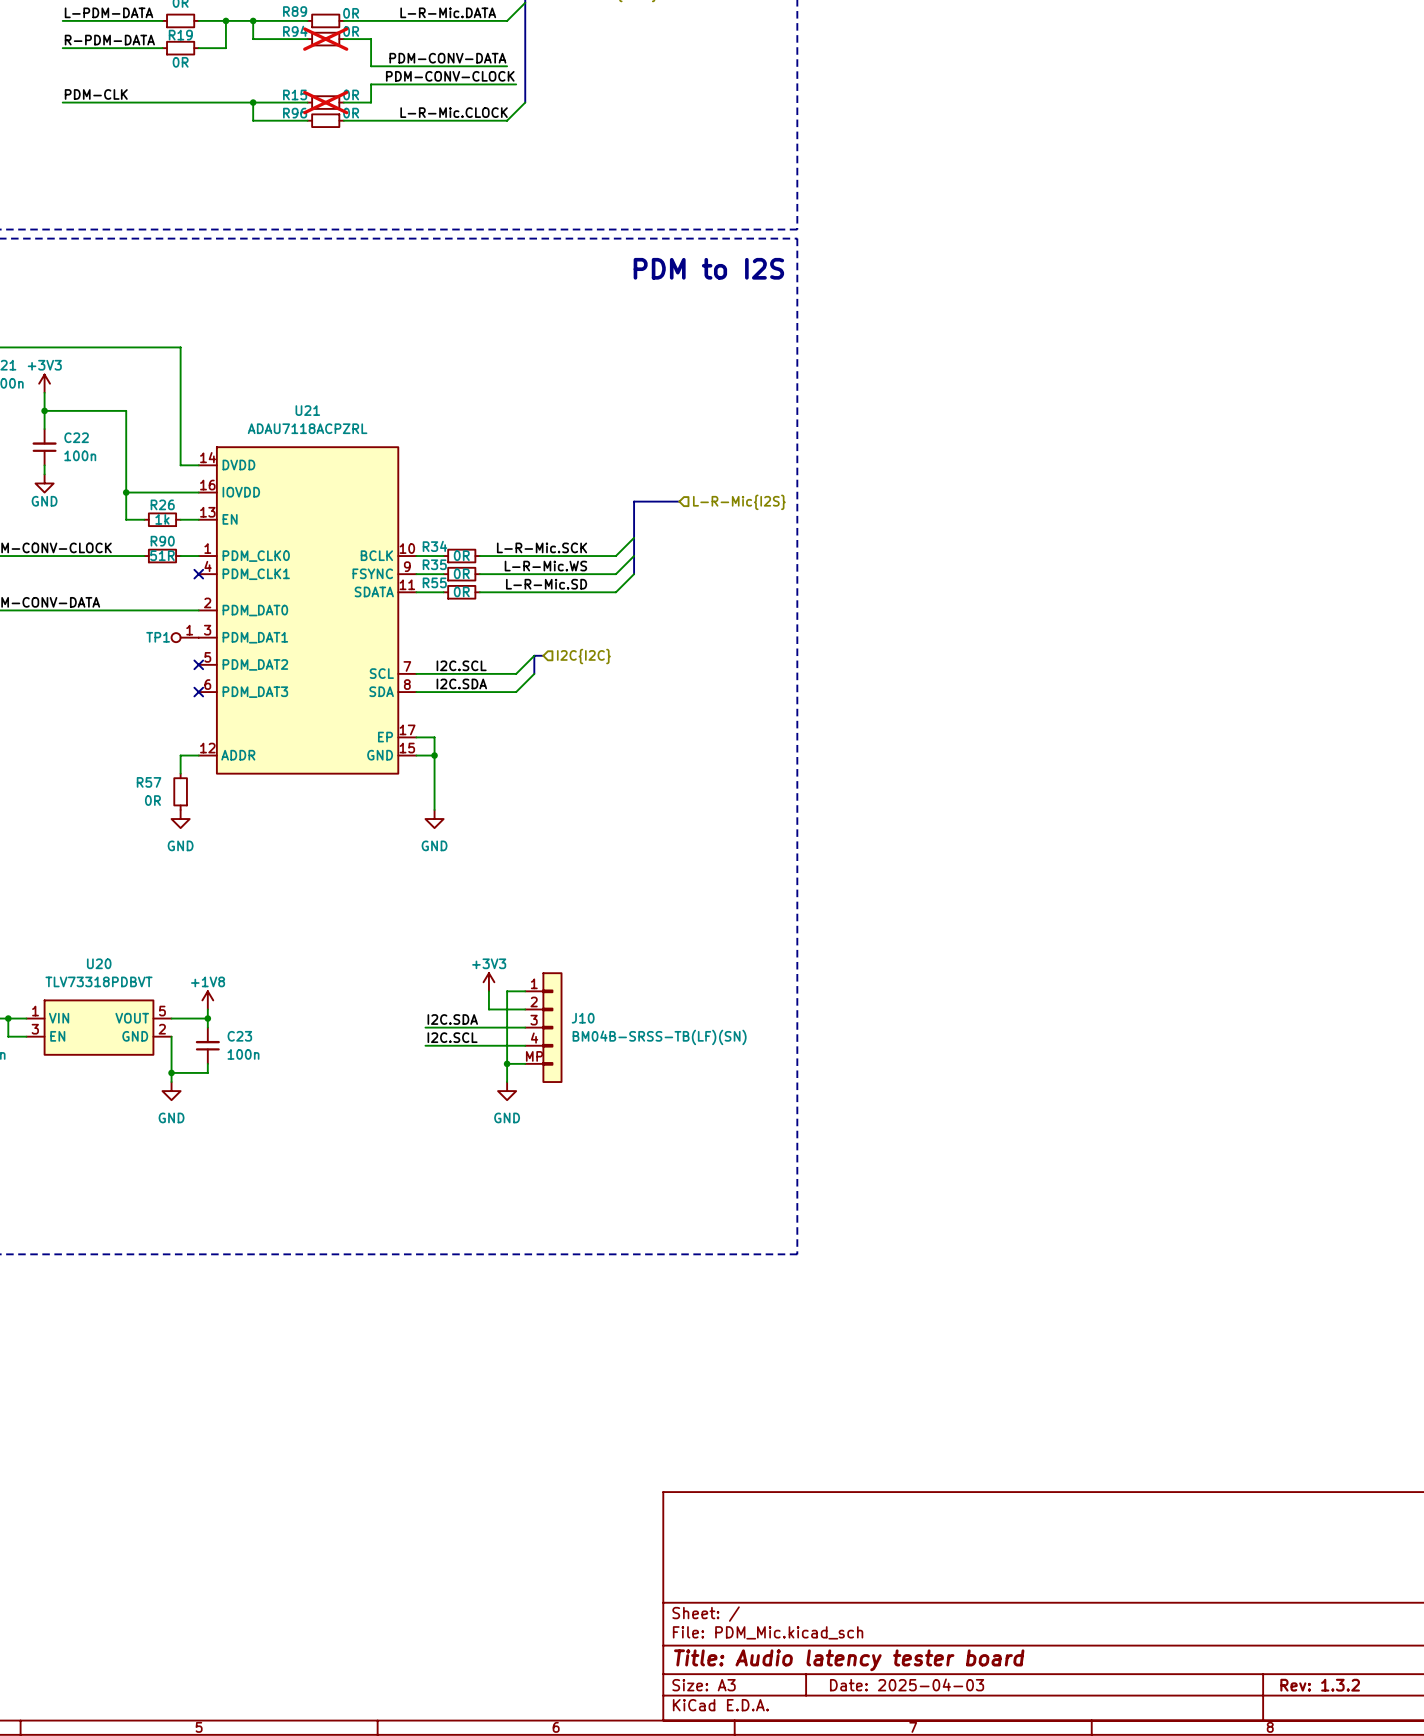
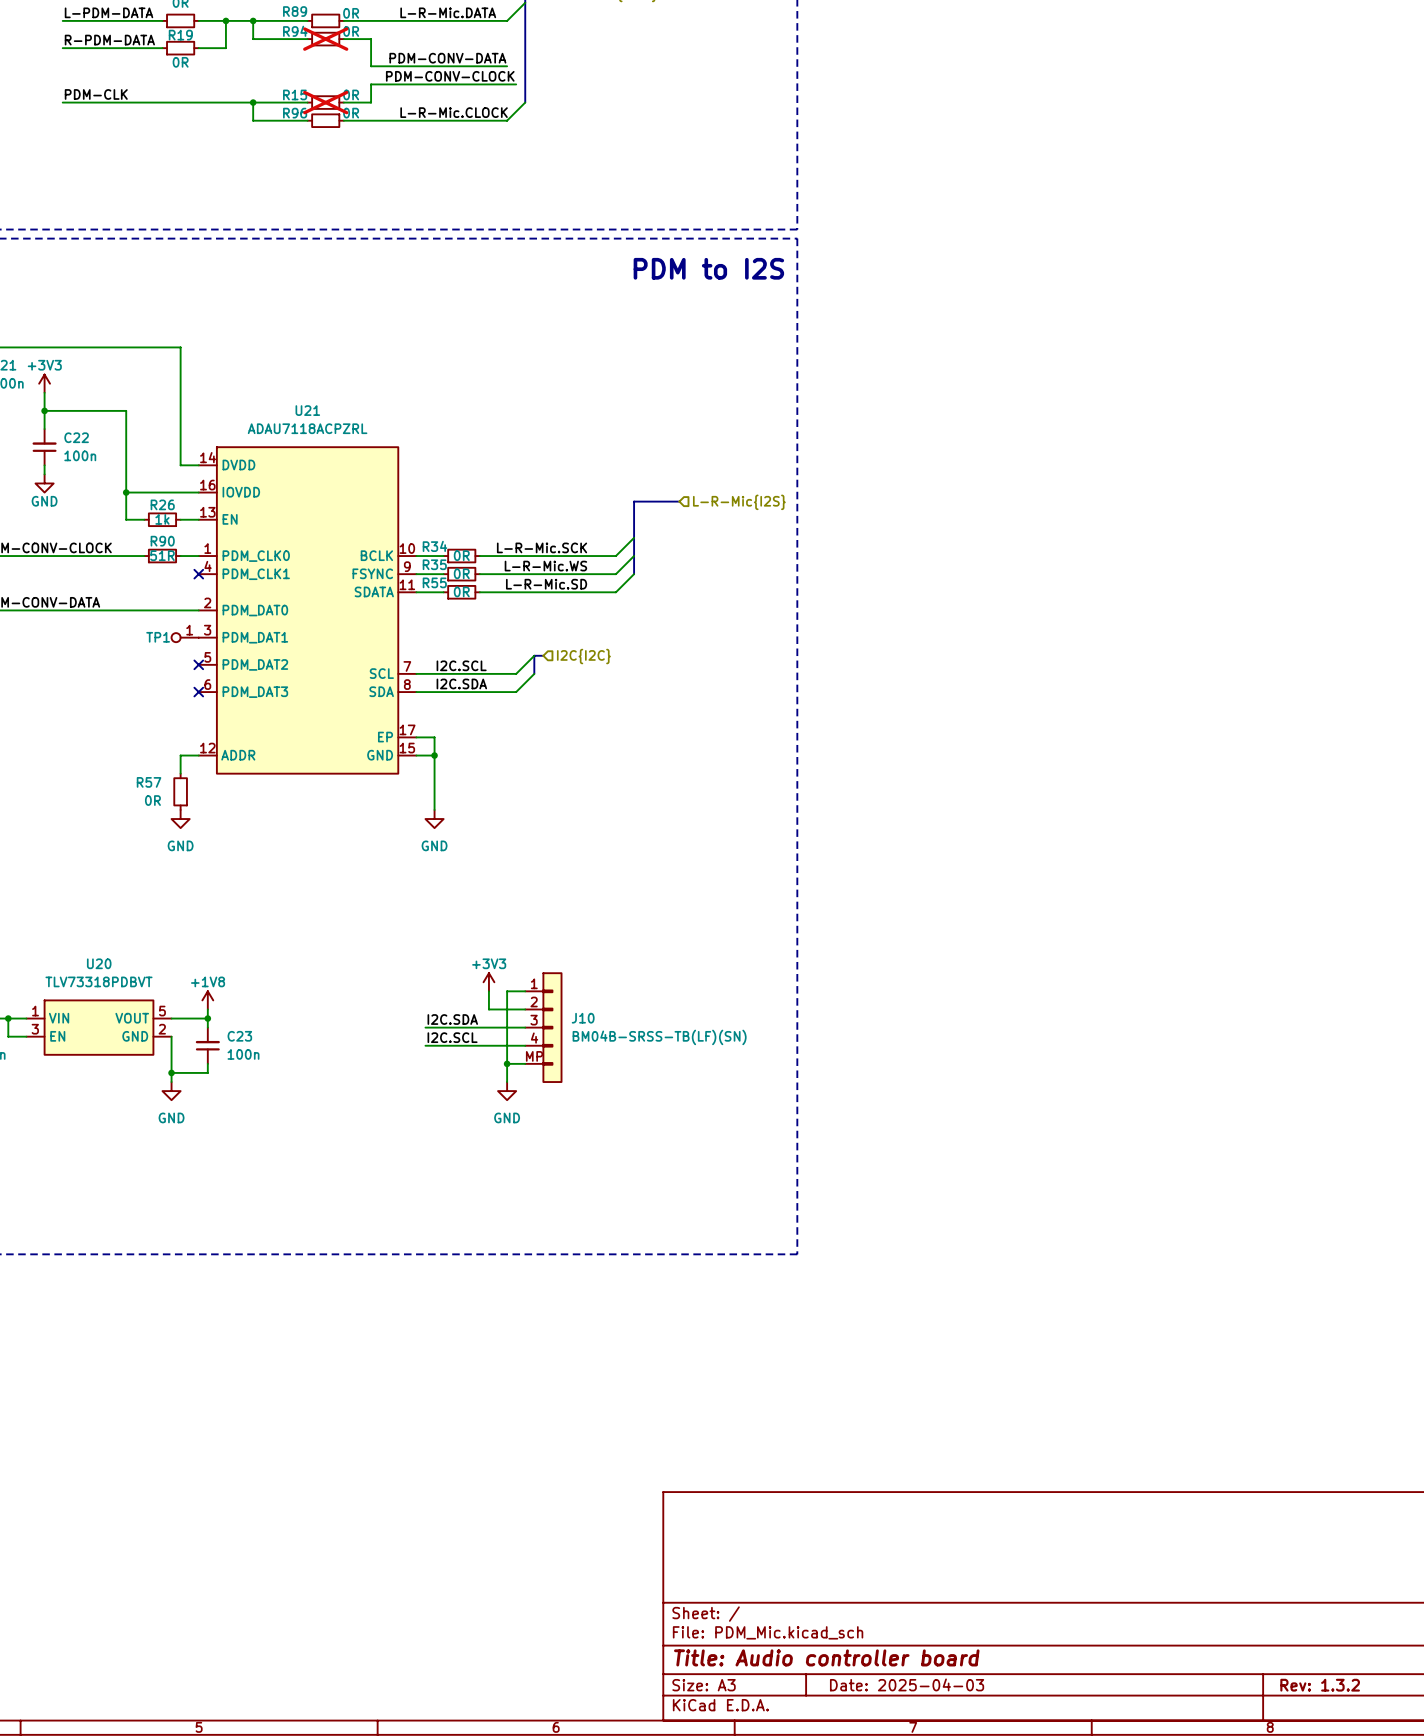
title block: Title: Audio latency tester board (849, 1660) -> Title: Audio controller board (826, 1657)

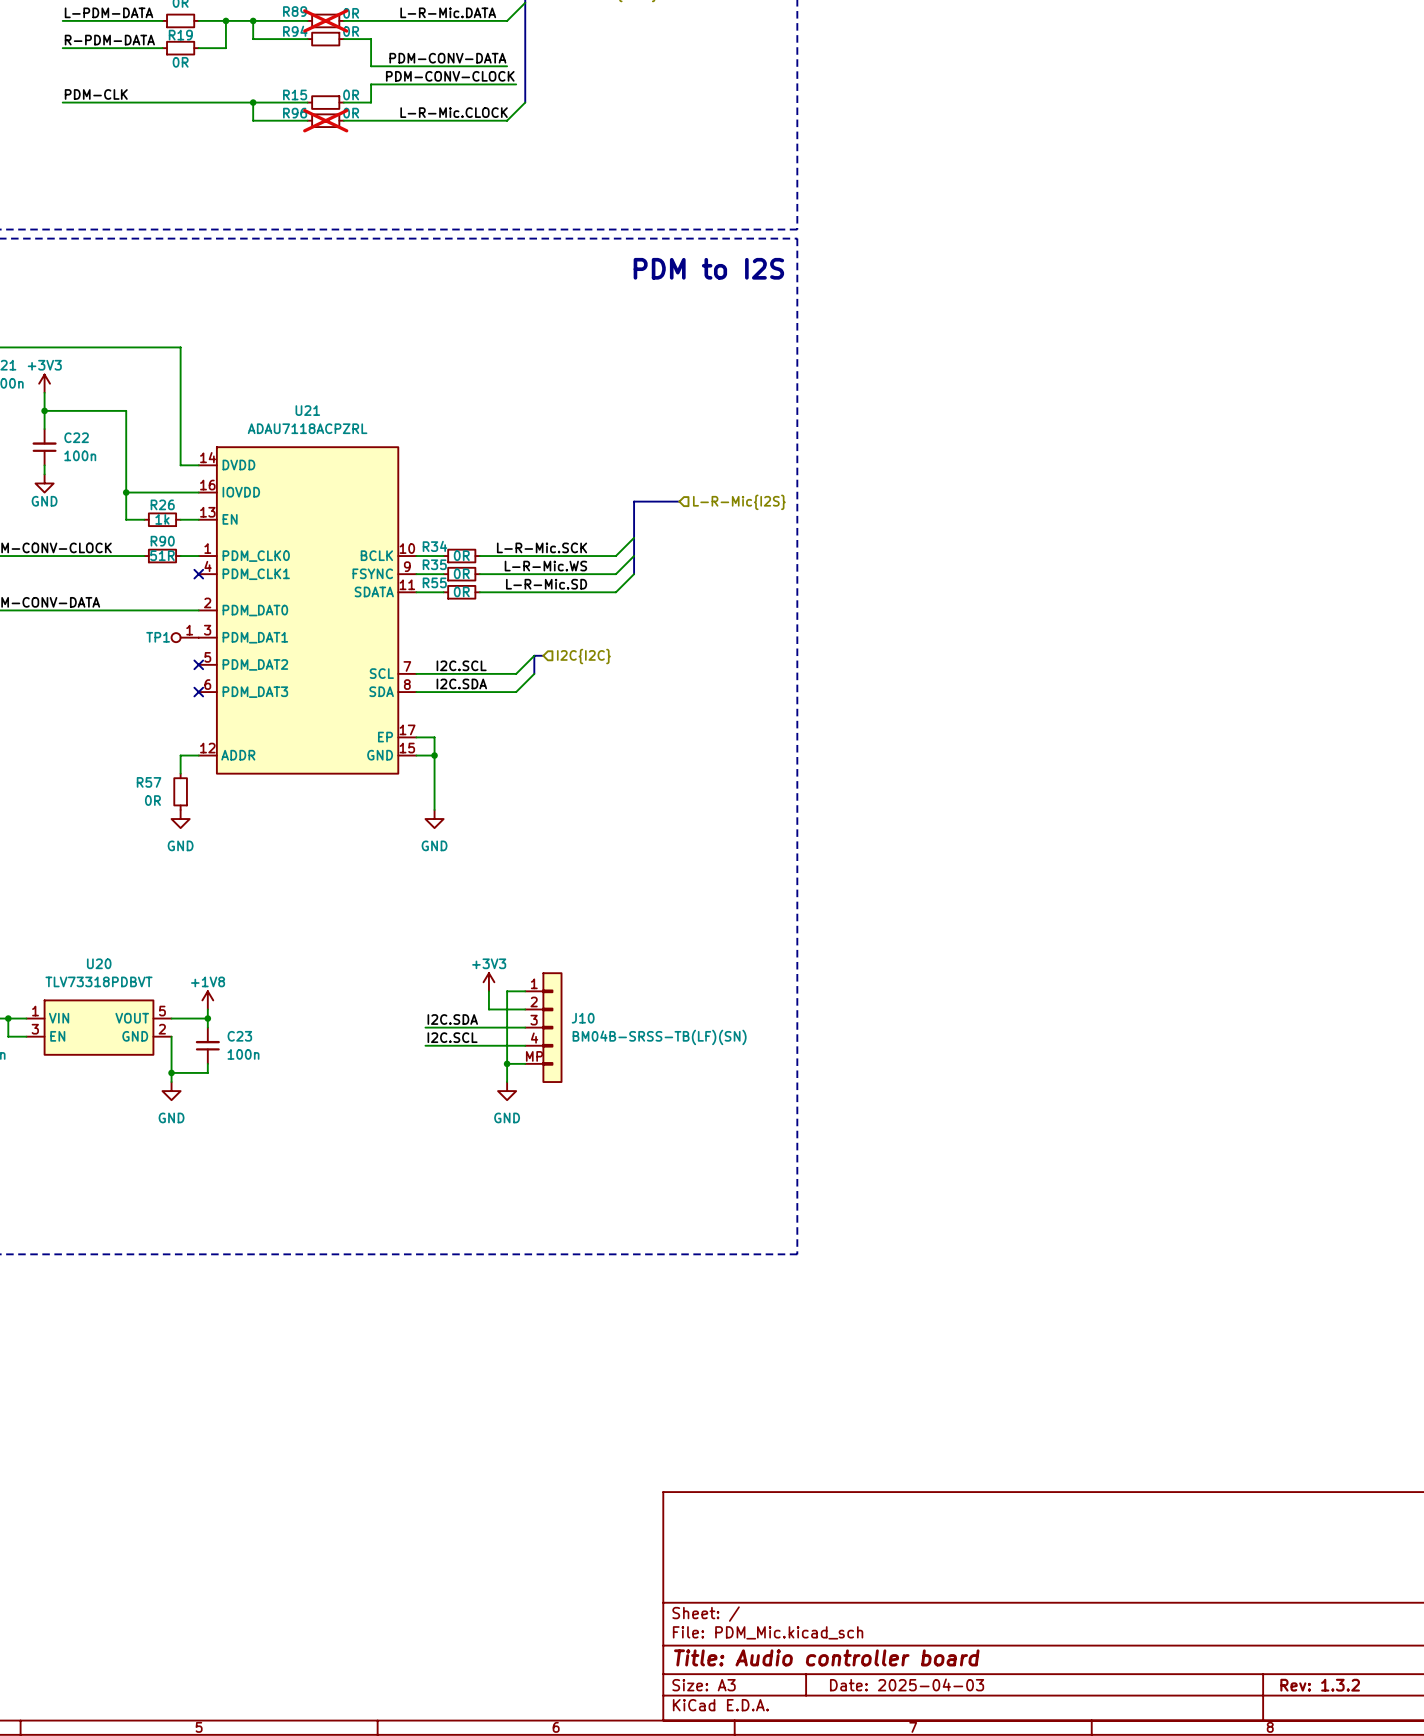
R89 do-not-place cross: none -> (325, 20)
R94 do-not-place cross: (325, 39) -> none
R15 do-not-place cross: (325, 102) -> none
R96 do-not-place cross: none -> (325, 120)

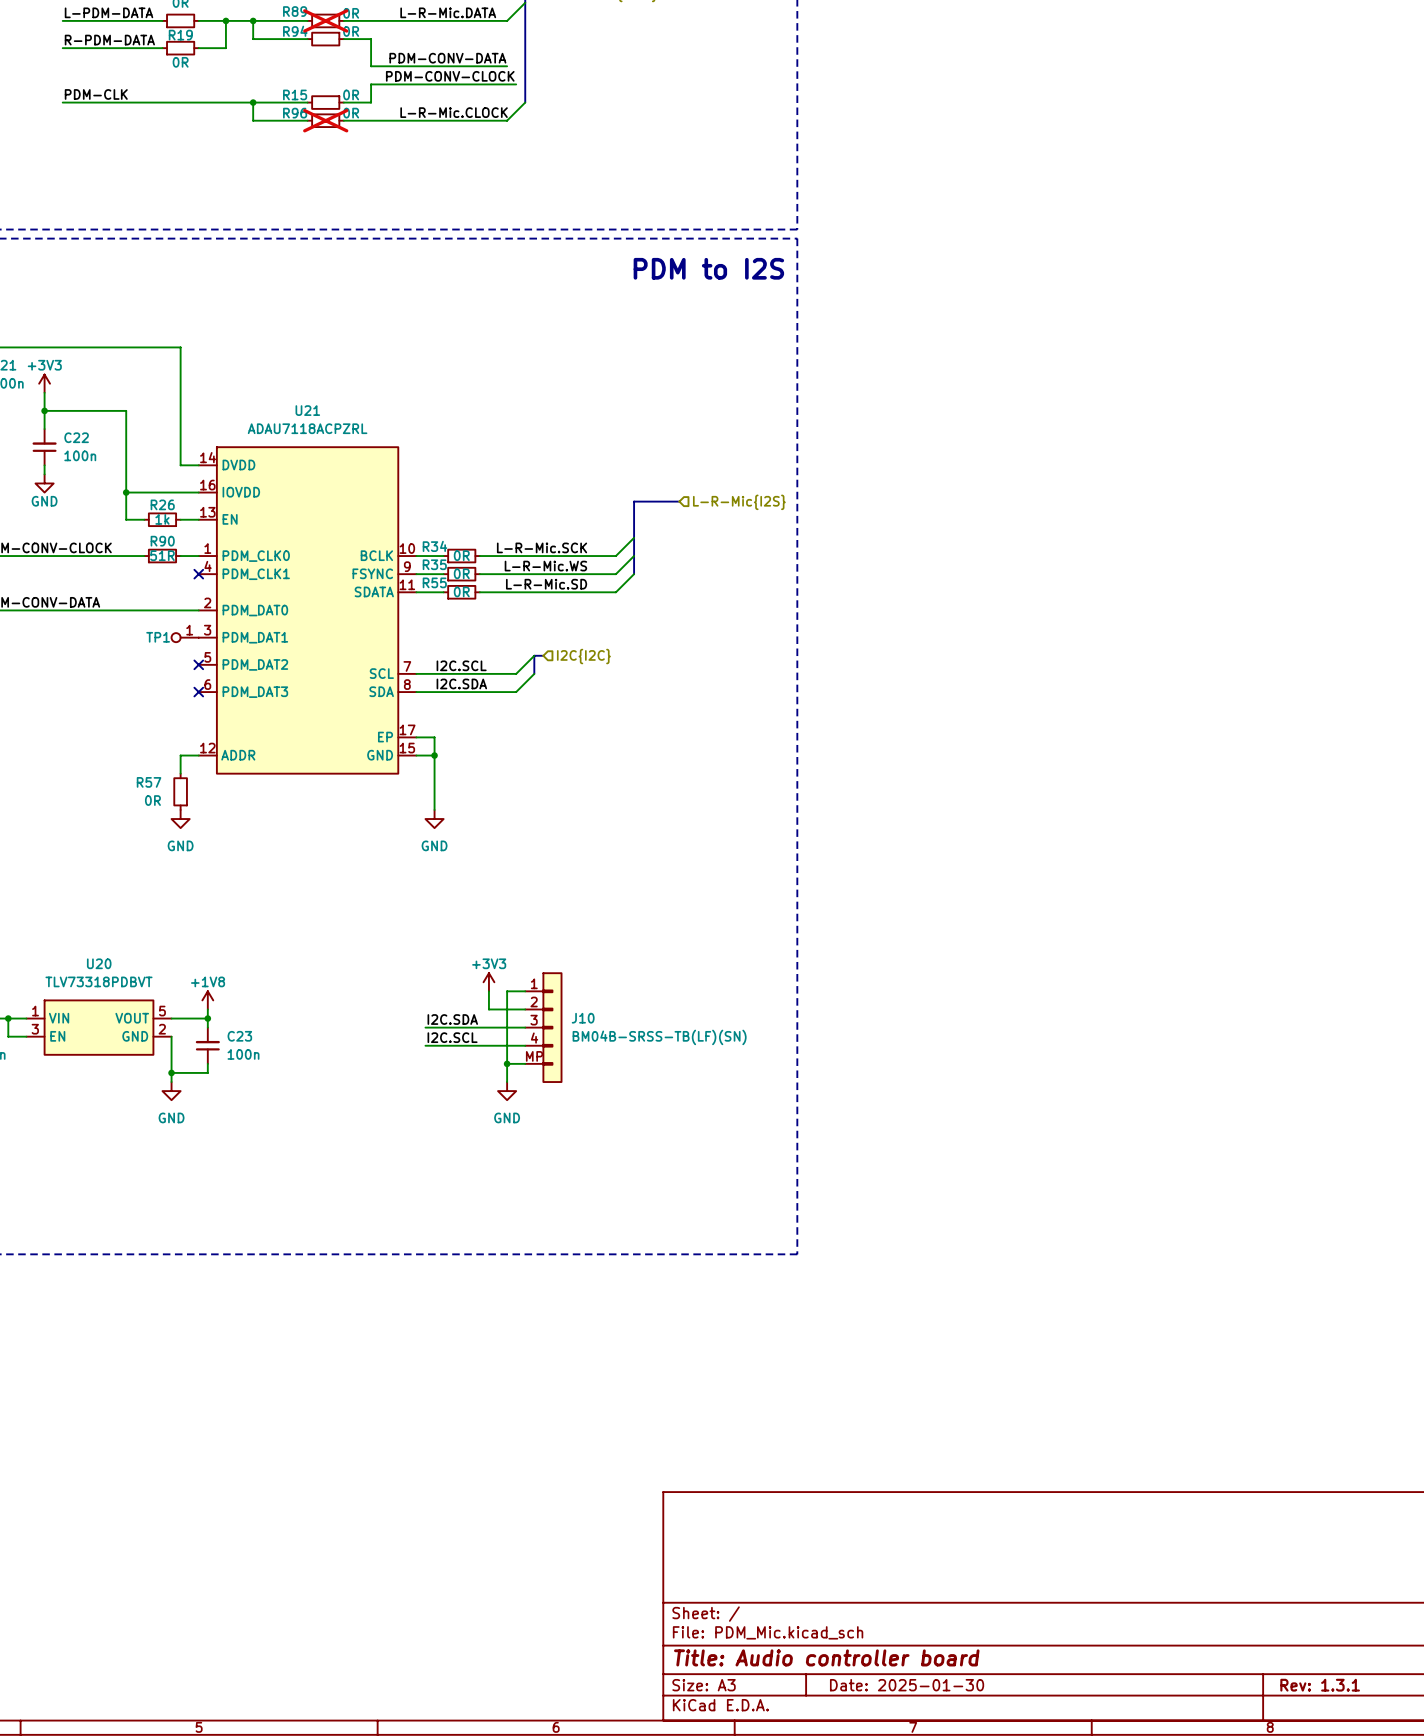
title block: Date: 2025-04-03 (907, 1684) -> Date: 2025-01-30 (907, 1685)
title block: Rev: 1.3.2 (1320, 1685) -> Rev: 1.3.1 (1320, 1685)

